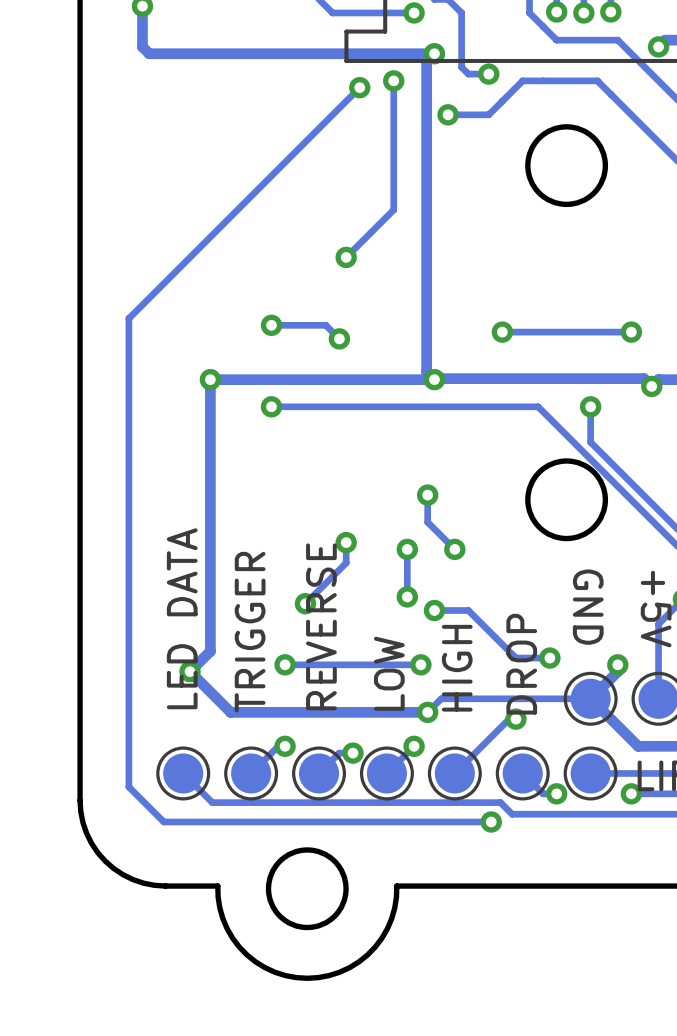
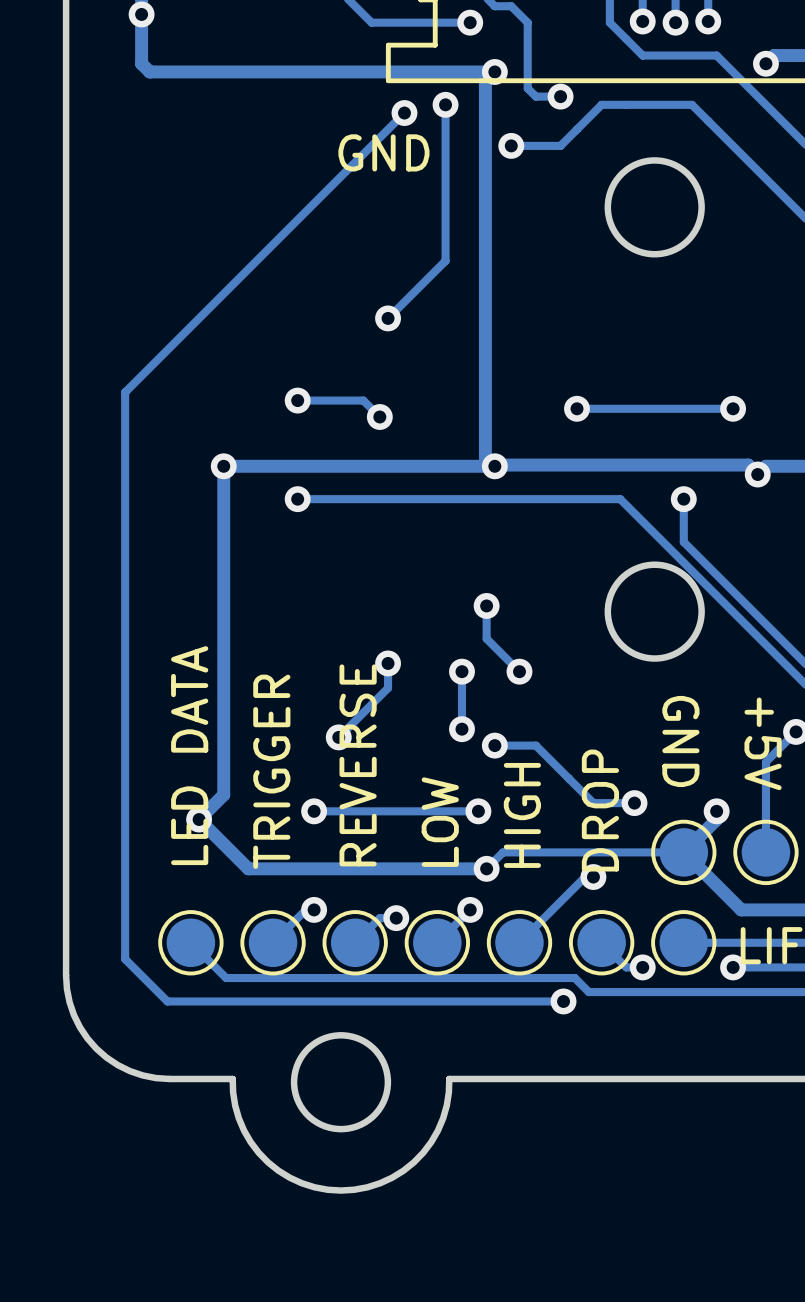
text: none -> GND (383, 152)

